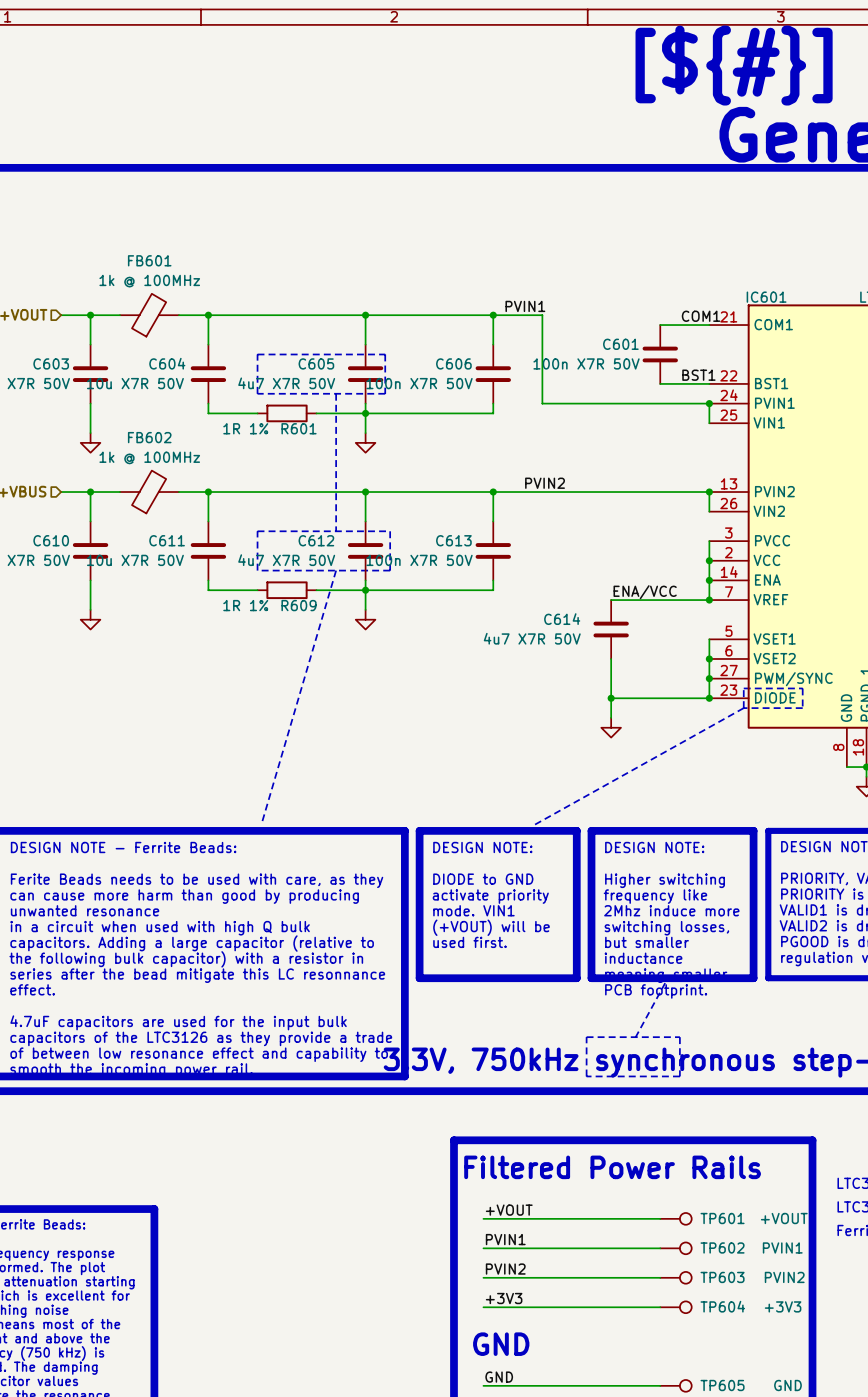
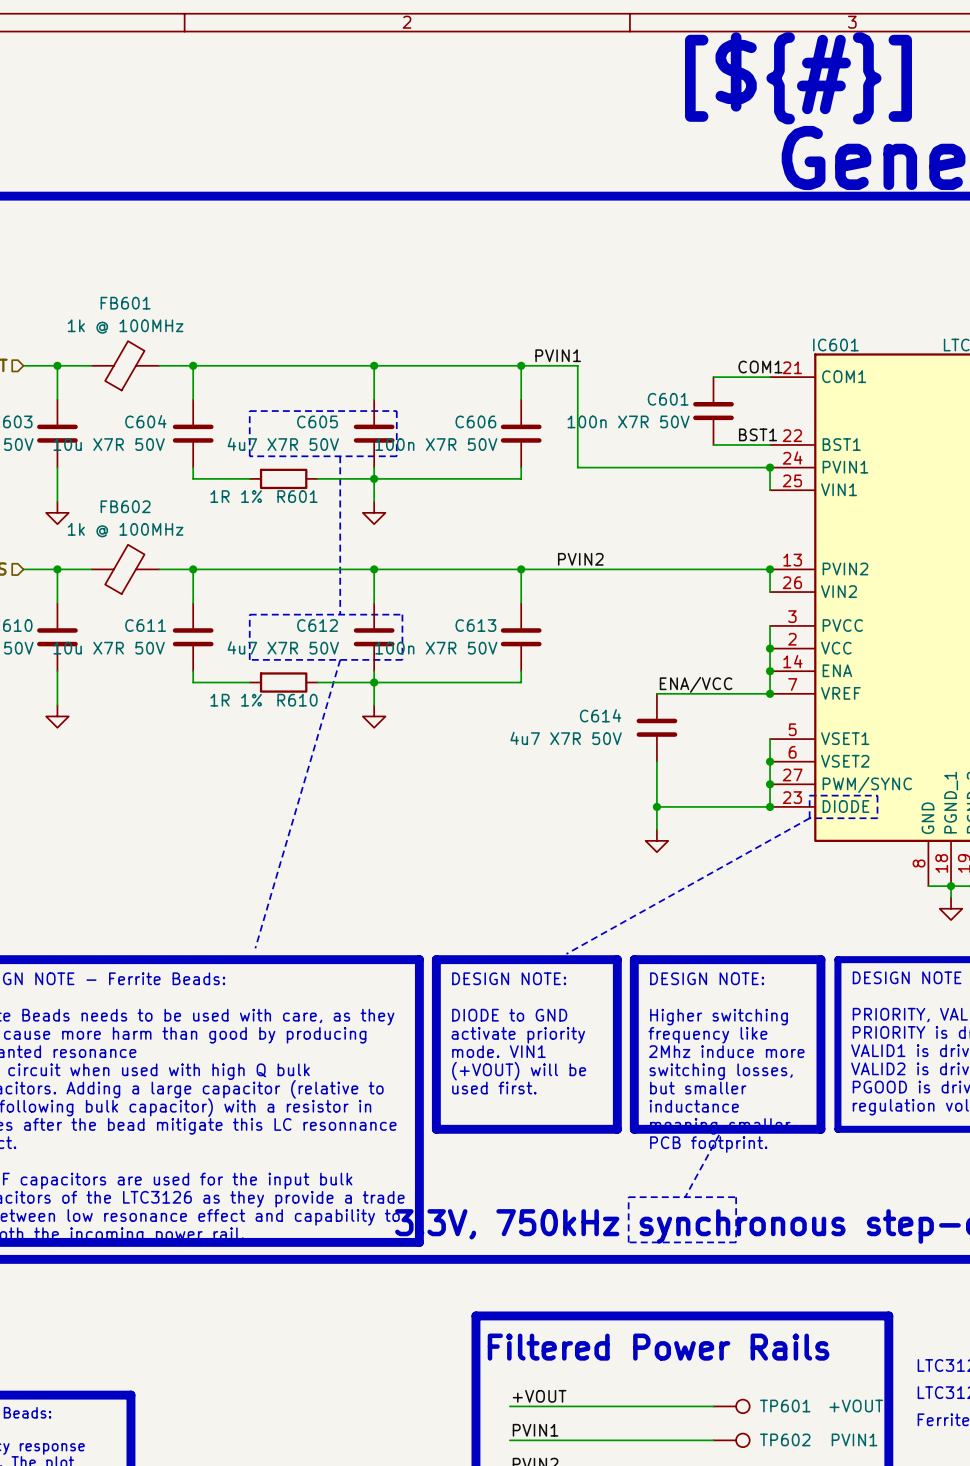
R609 name: R609 (299, 605) -> R610 (297, 700)

